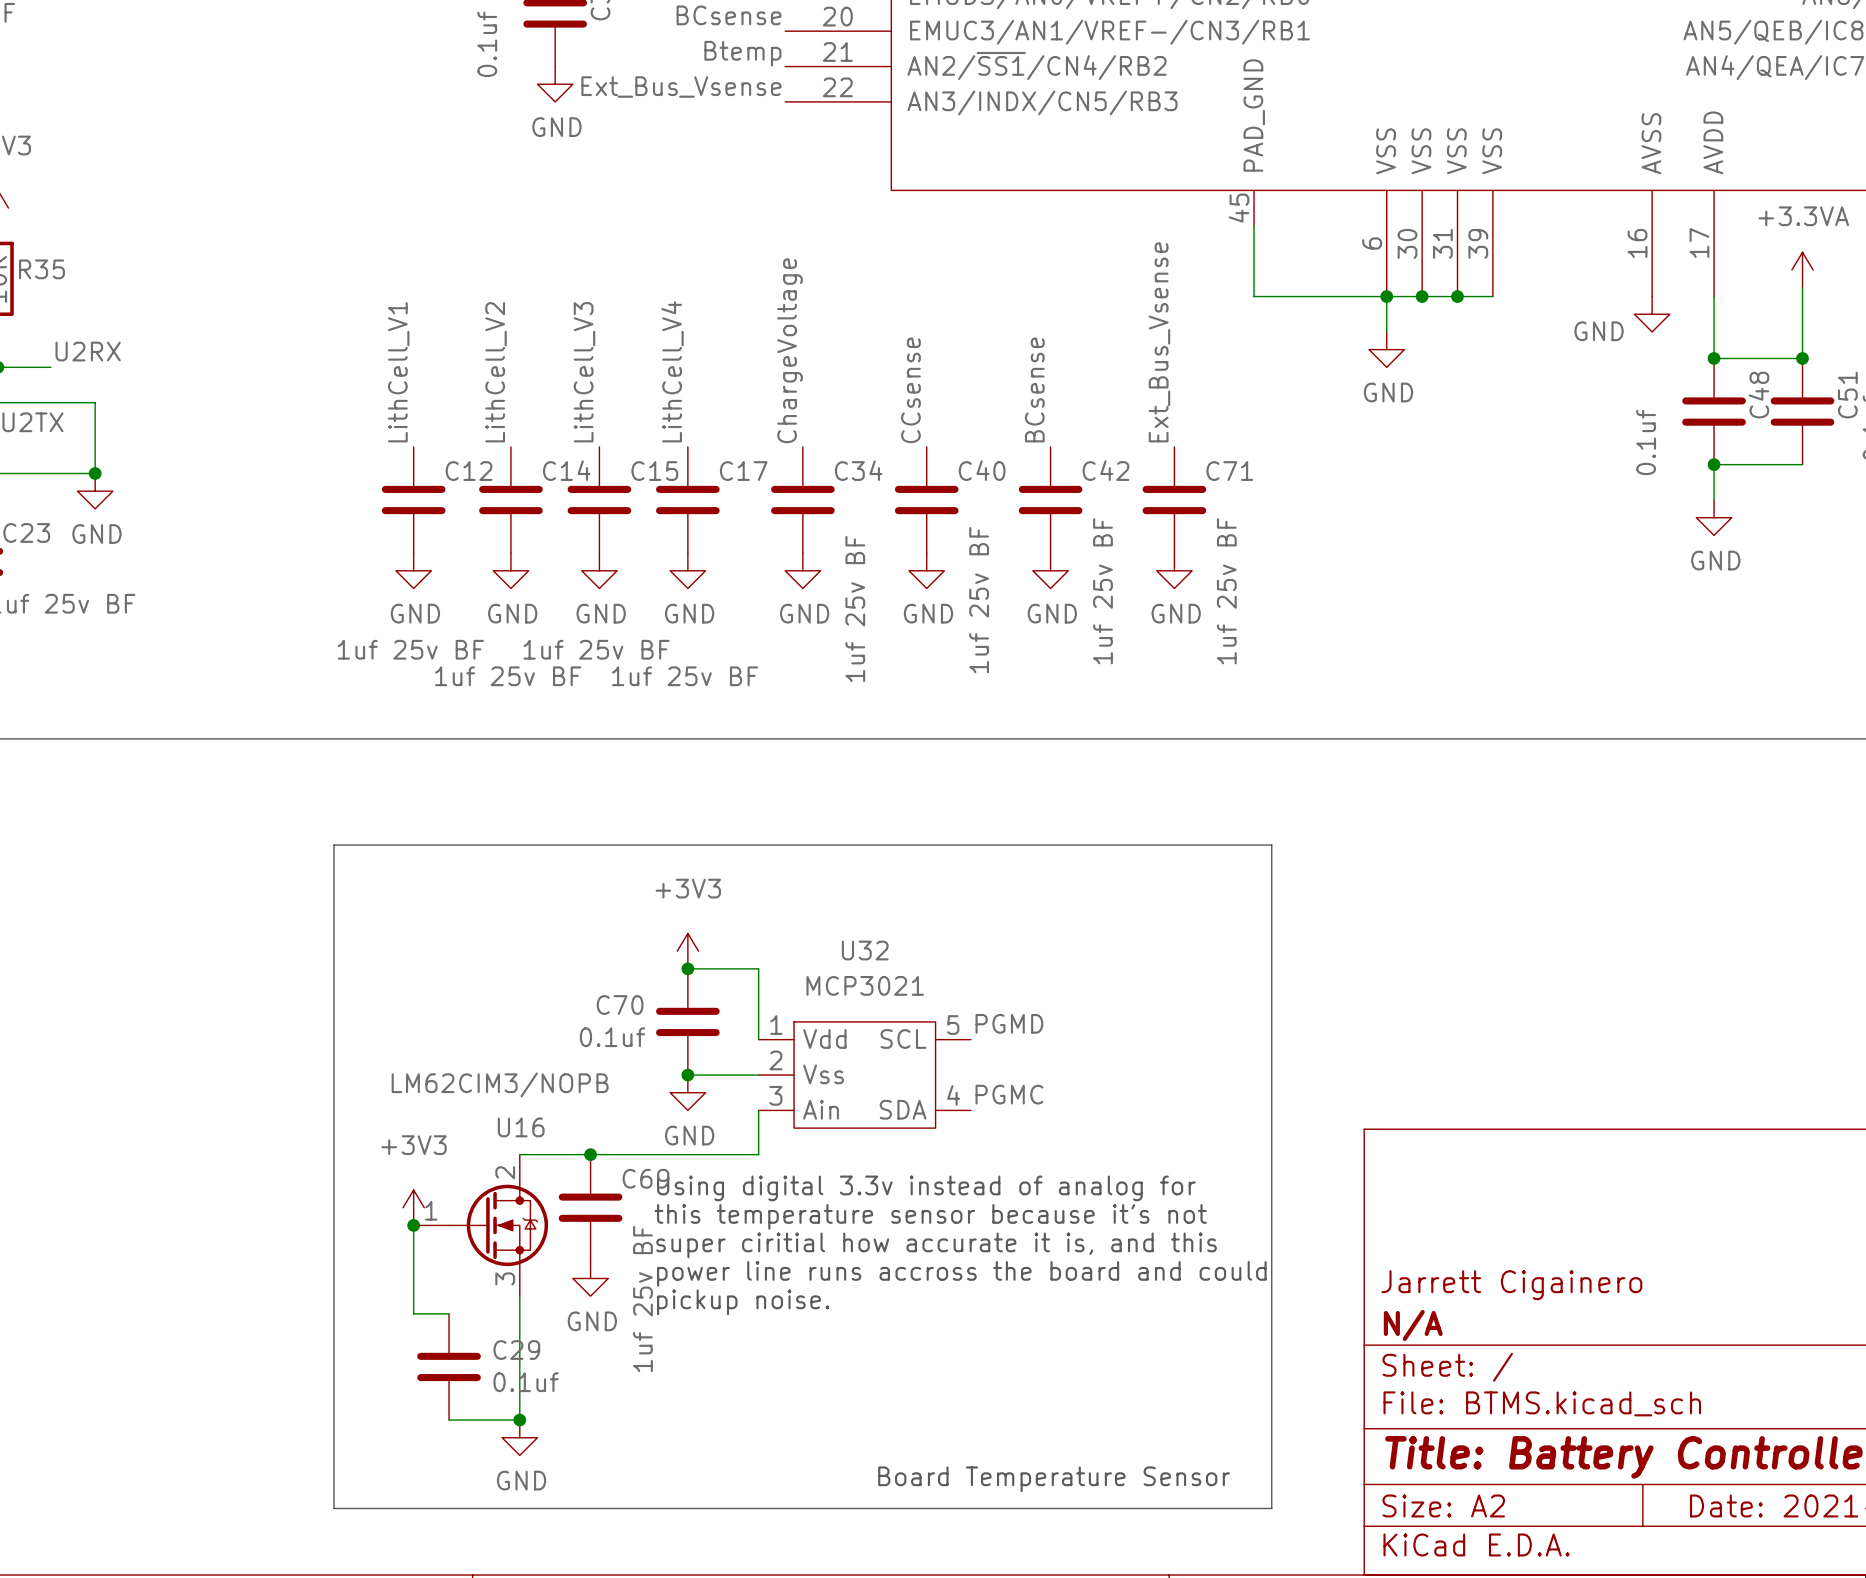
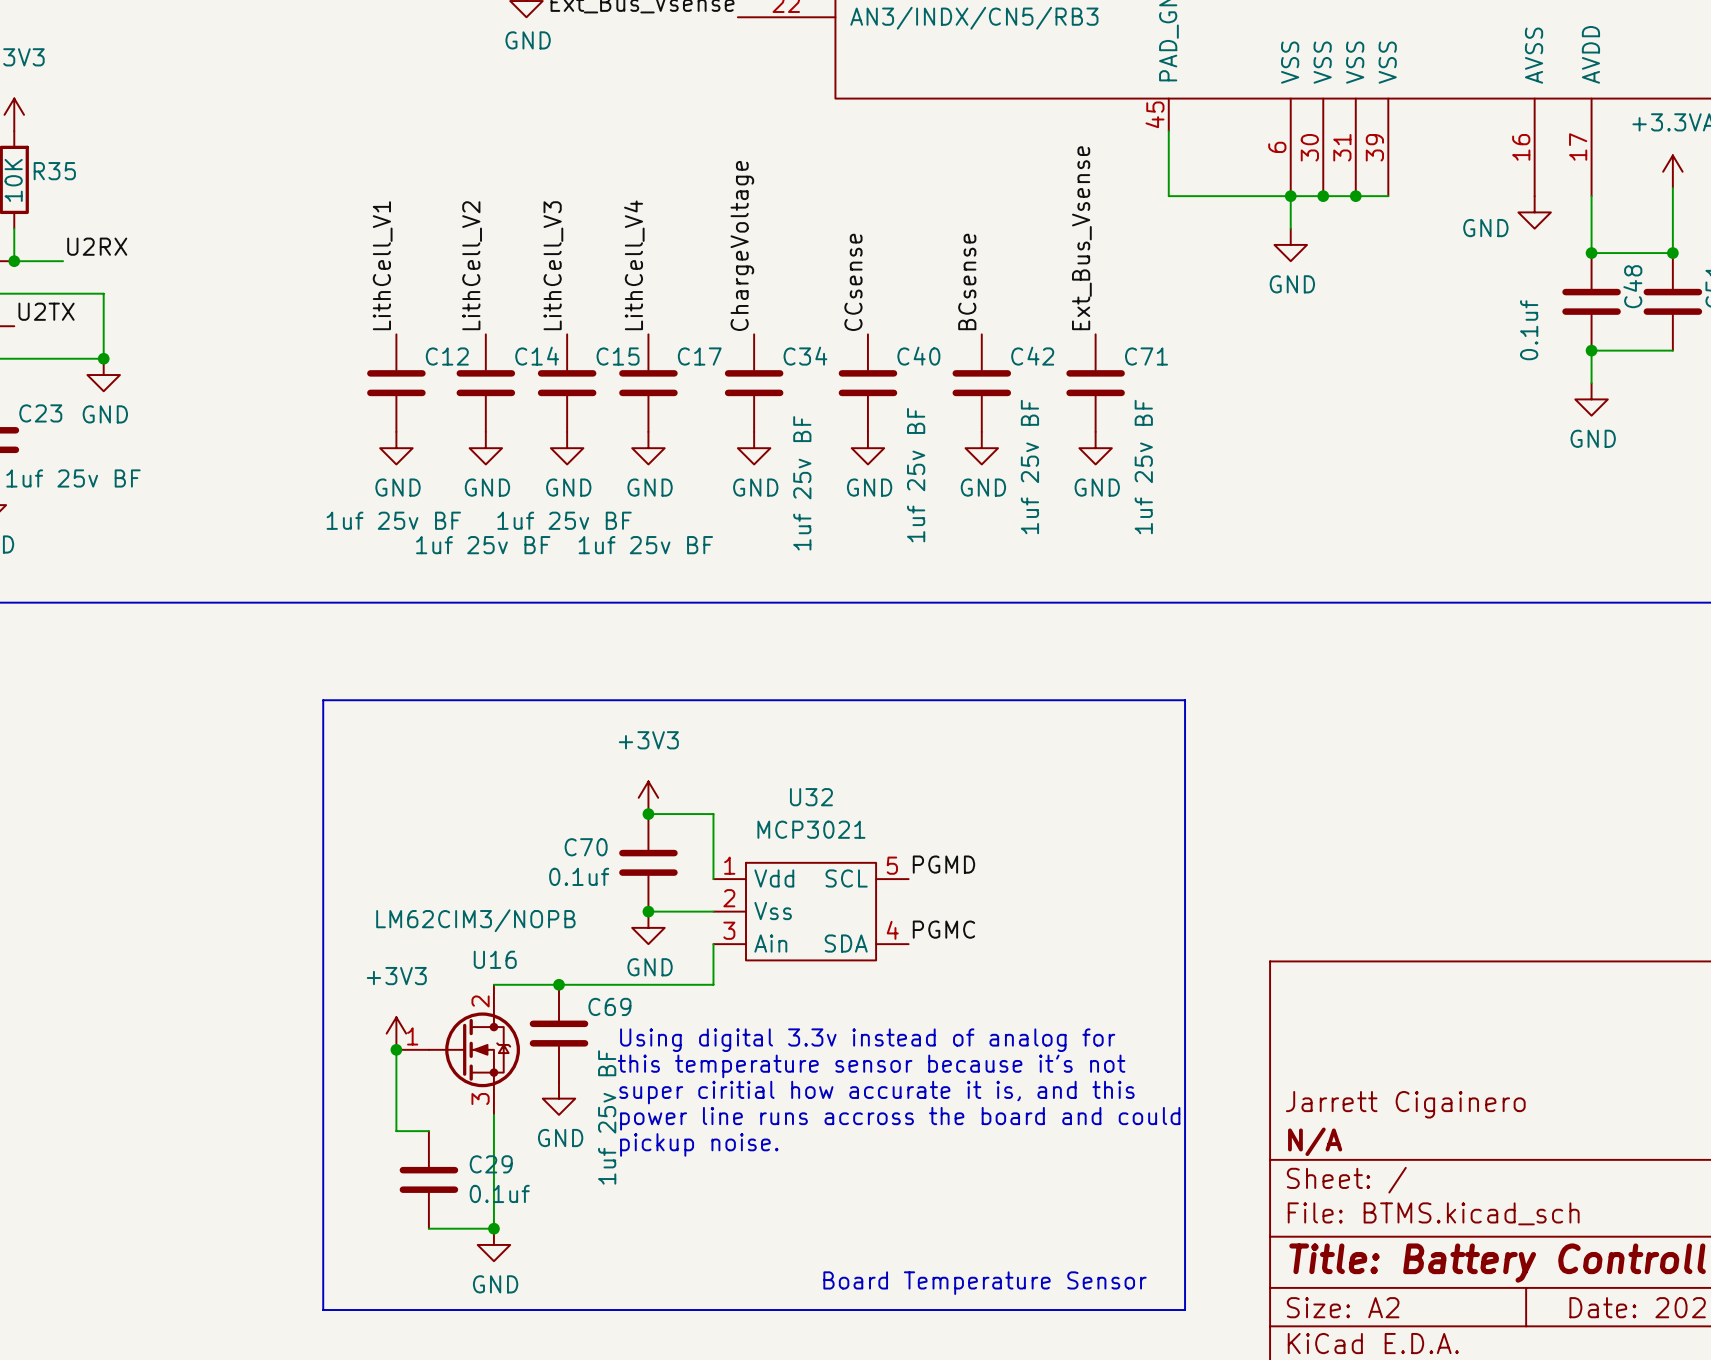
text: Using digital 3.3v instead of analog for (926, 1188) -> none
text: this temperature sensor because it's not (930, 1216) -> Using digital 3.3v instead of analog for (867, 1040)
text: super ciritial how accurate it is, and this (936, 1245) -> this temperature sensor because it's not (871, 1066)
text: power line runs accross the board and could (961, 1273) -> super ciritial how accurate it is, and this (876, 1092)
text: pickup noise. (743, 1302) -> power line runs accross the board and could (900, 1118)
text: none -> pickup noise. (699, 1144)

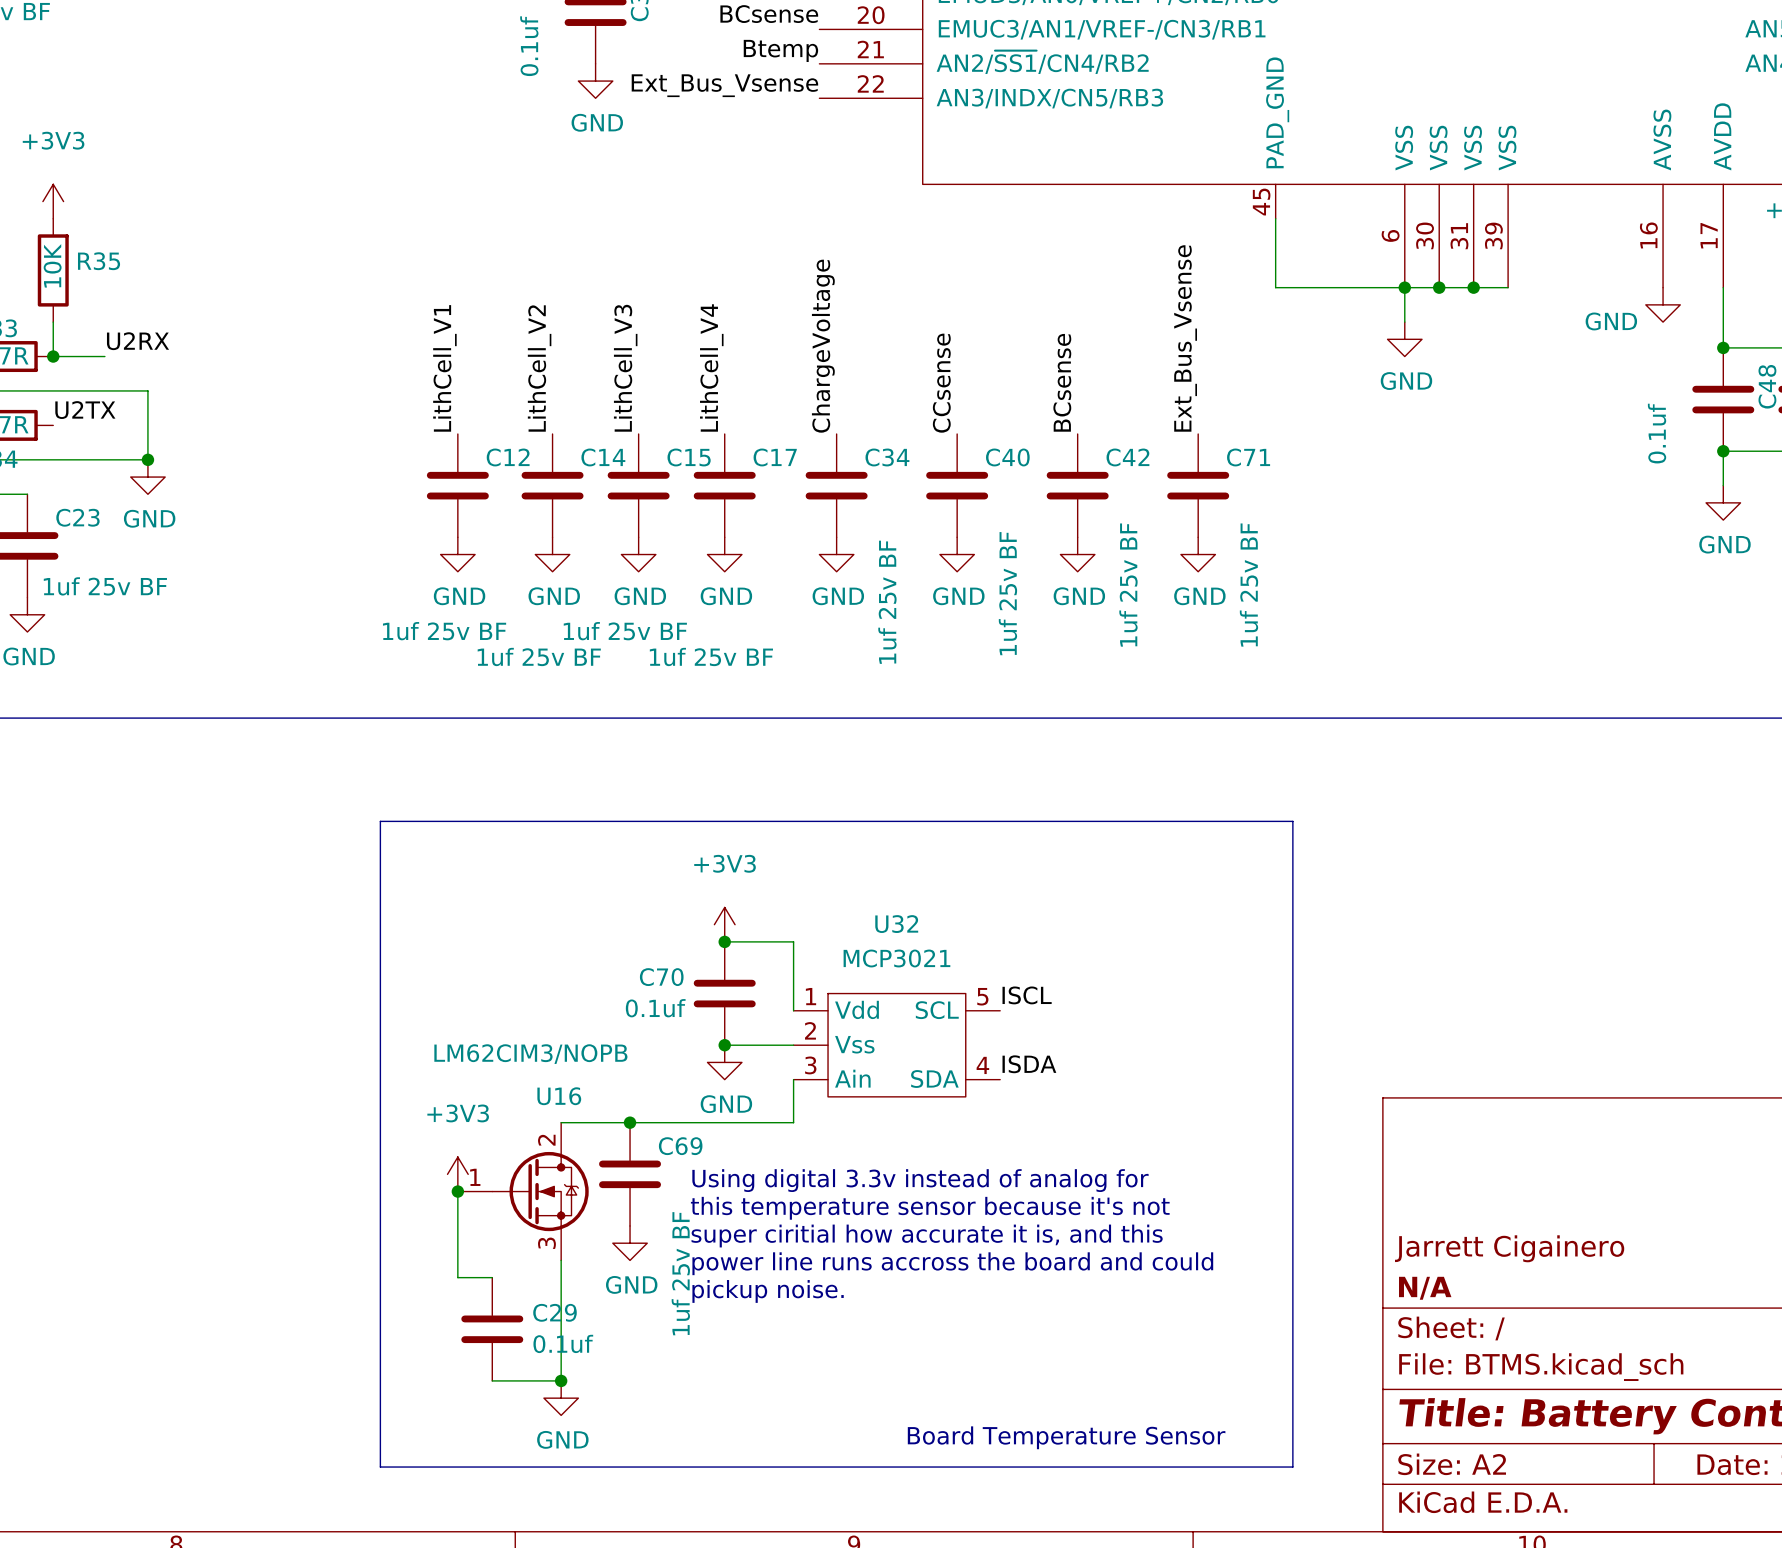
label: PGMD (943, 864) -> ISCL (1027, 995)
label: PGMC (943, 929) -> ISDA (1029, 1064)

